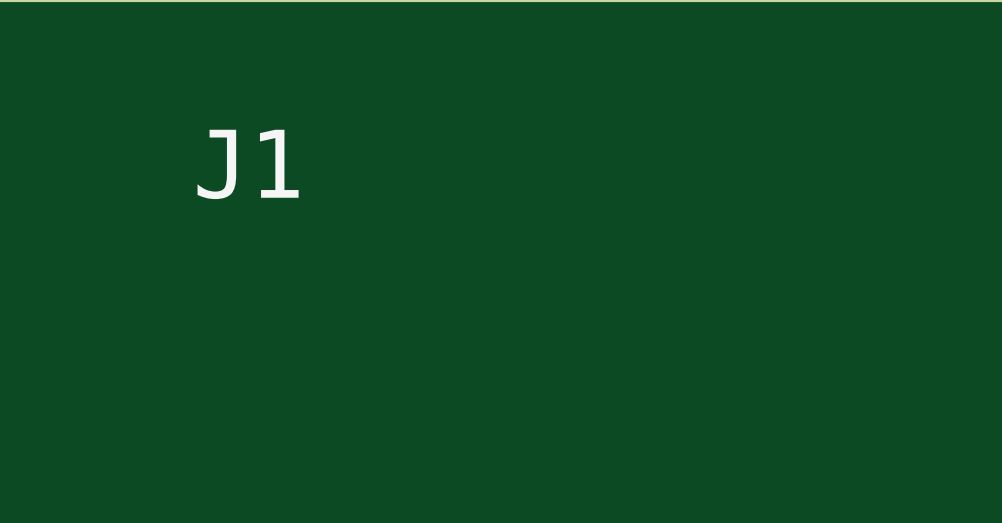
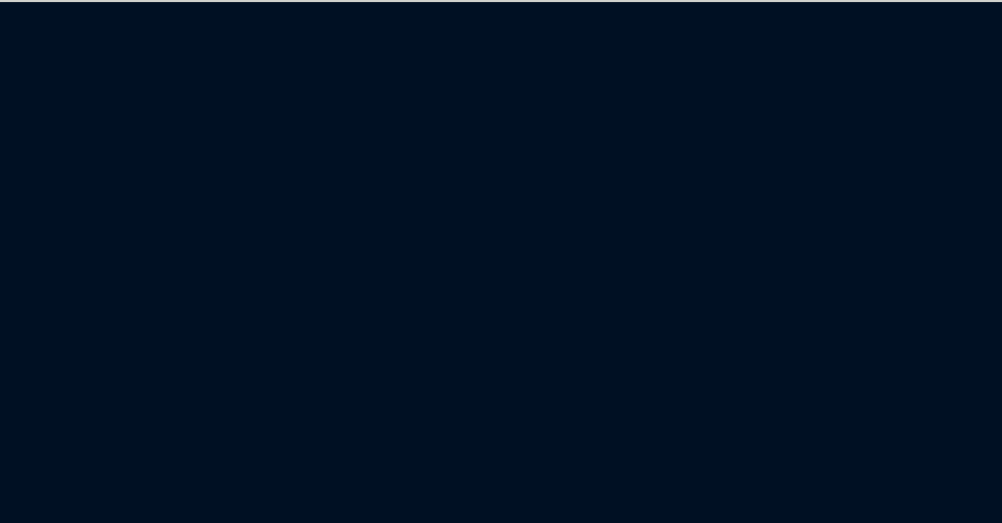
J1 name: J1 (248, 164) -> none

